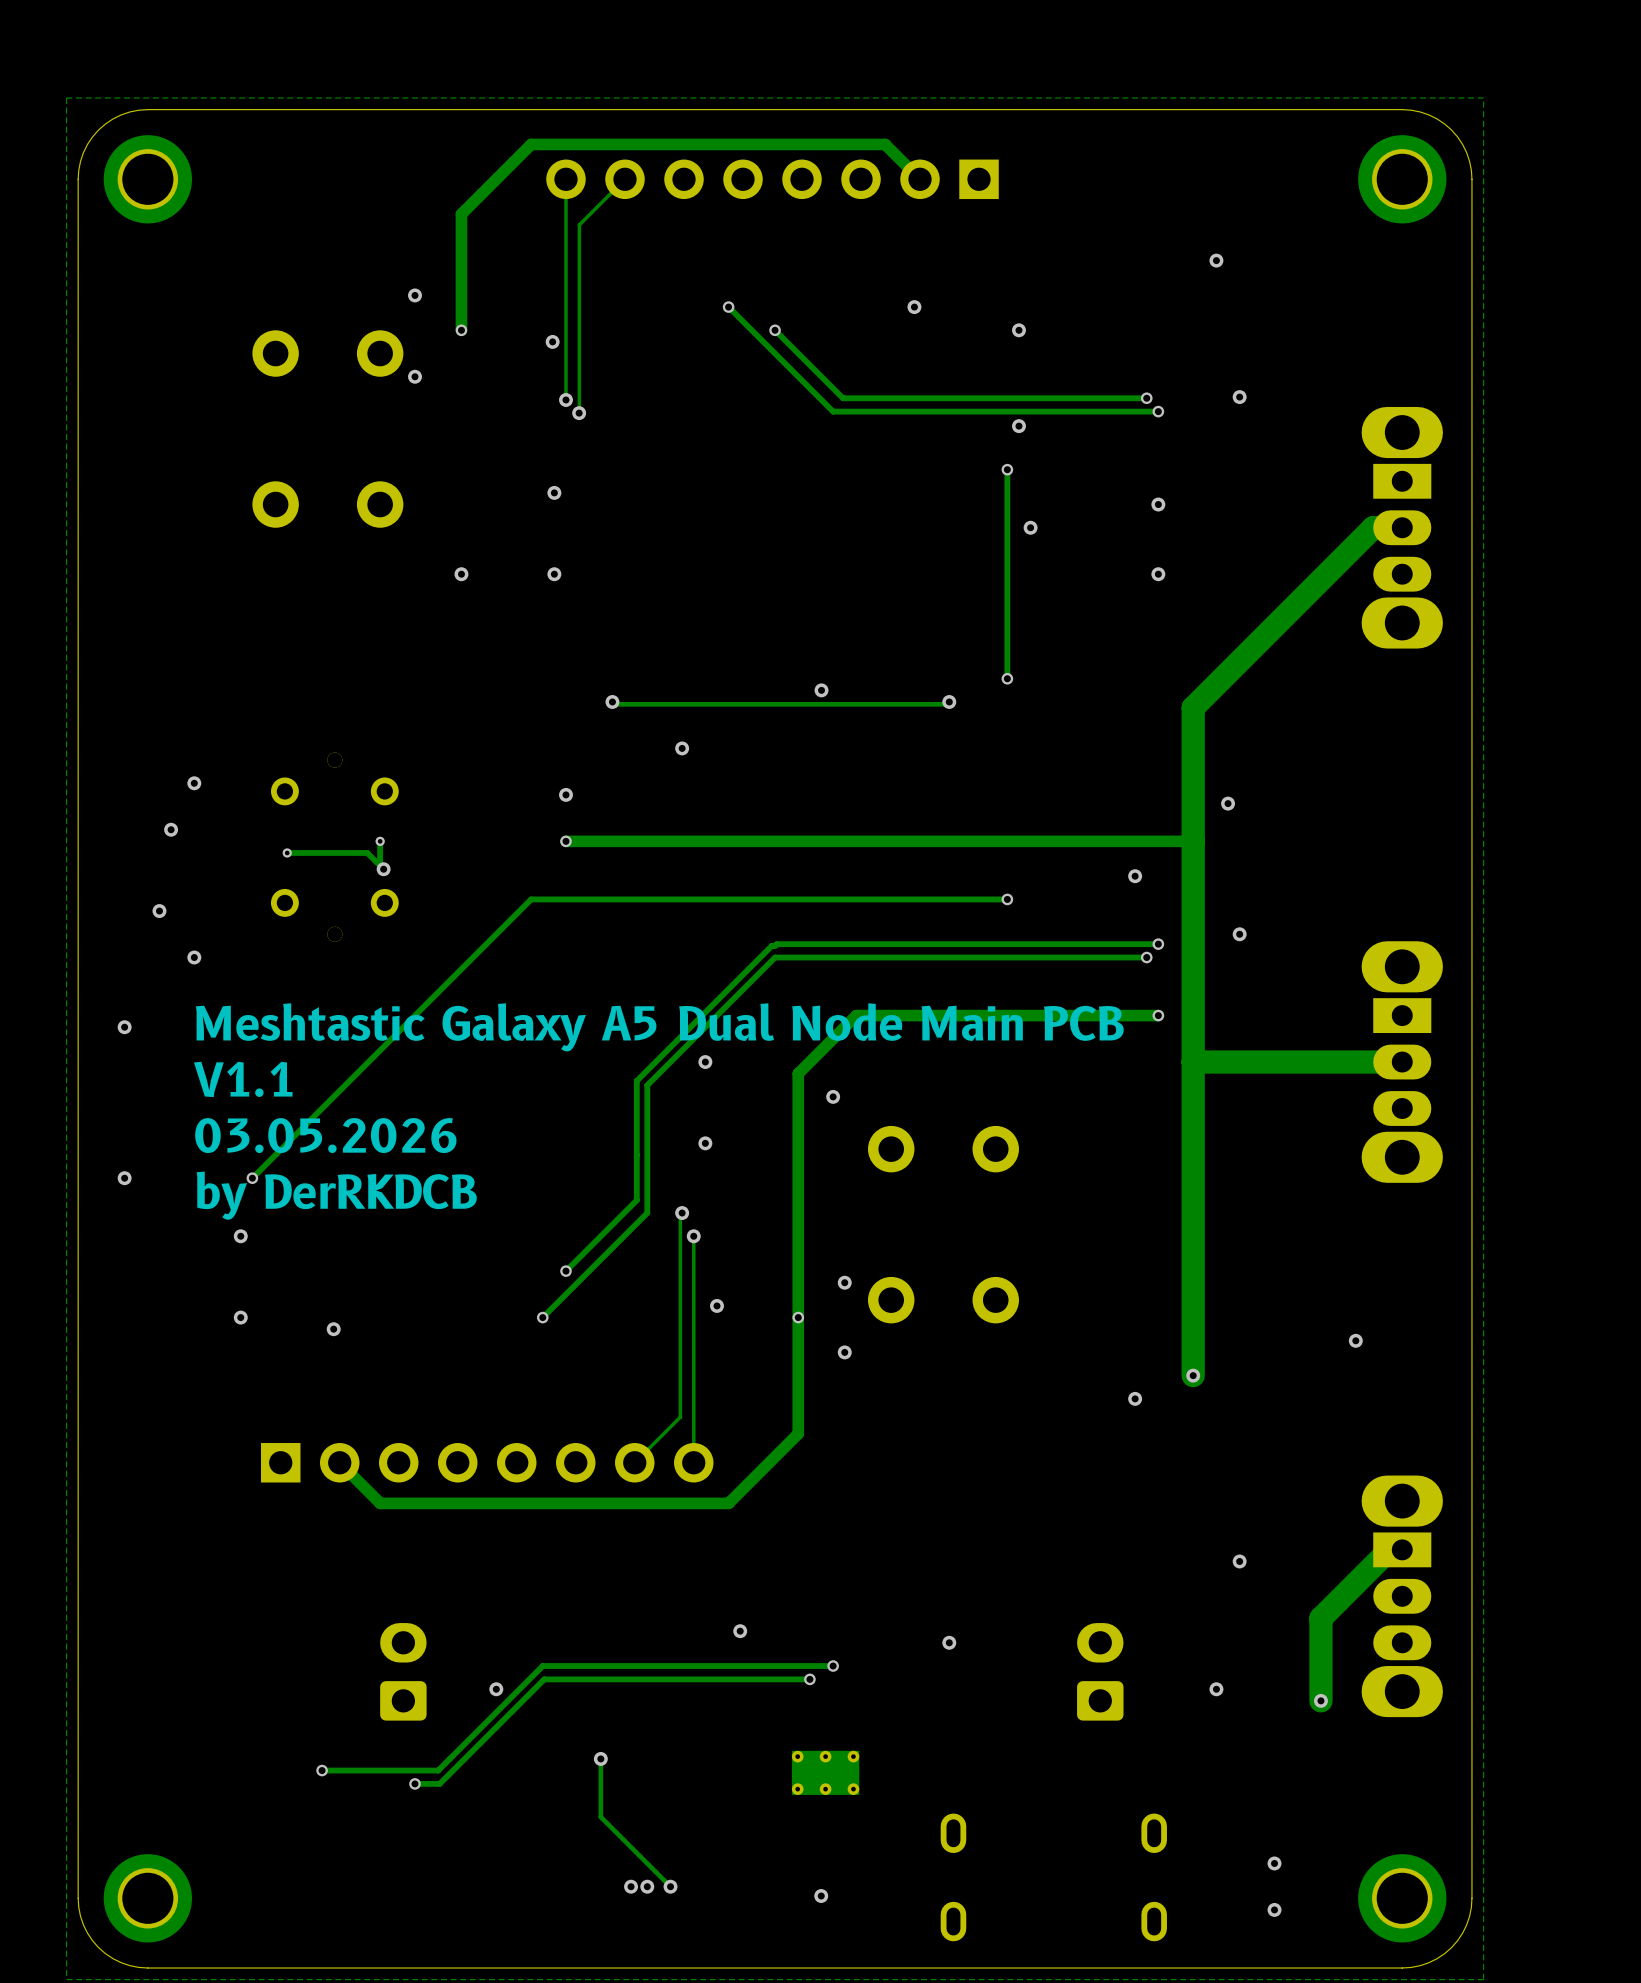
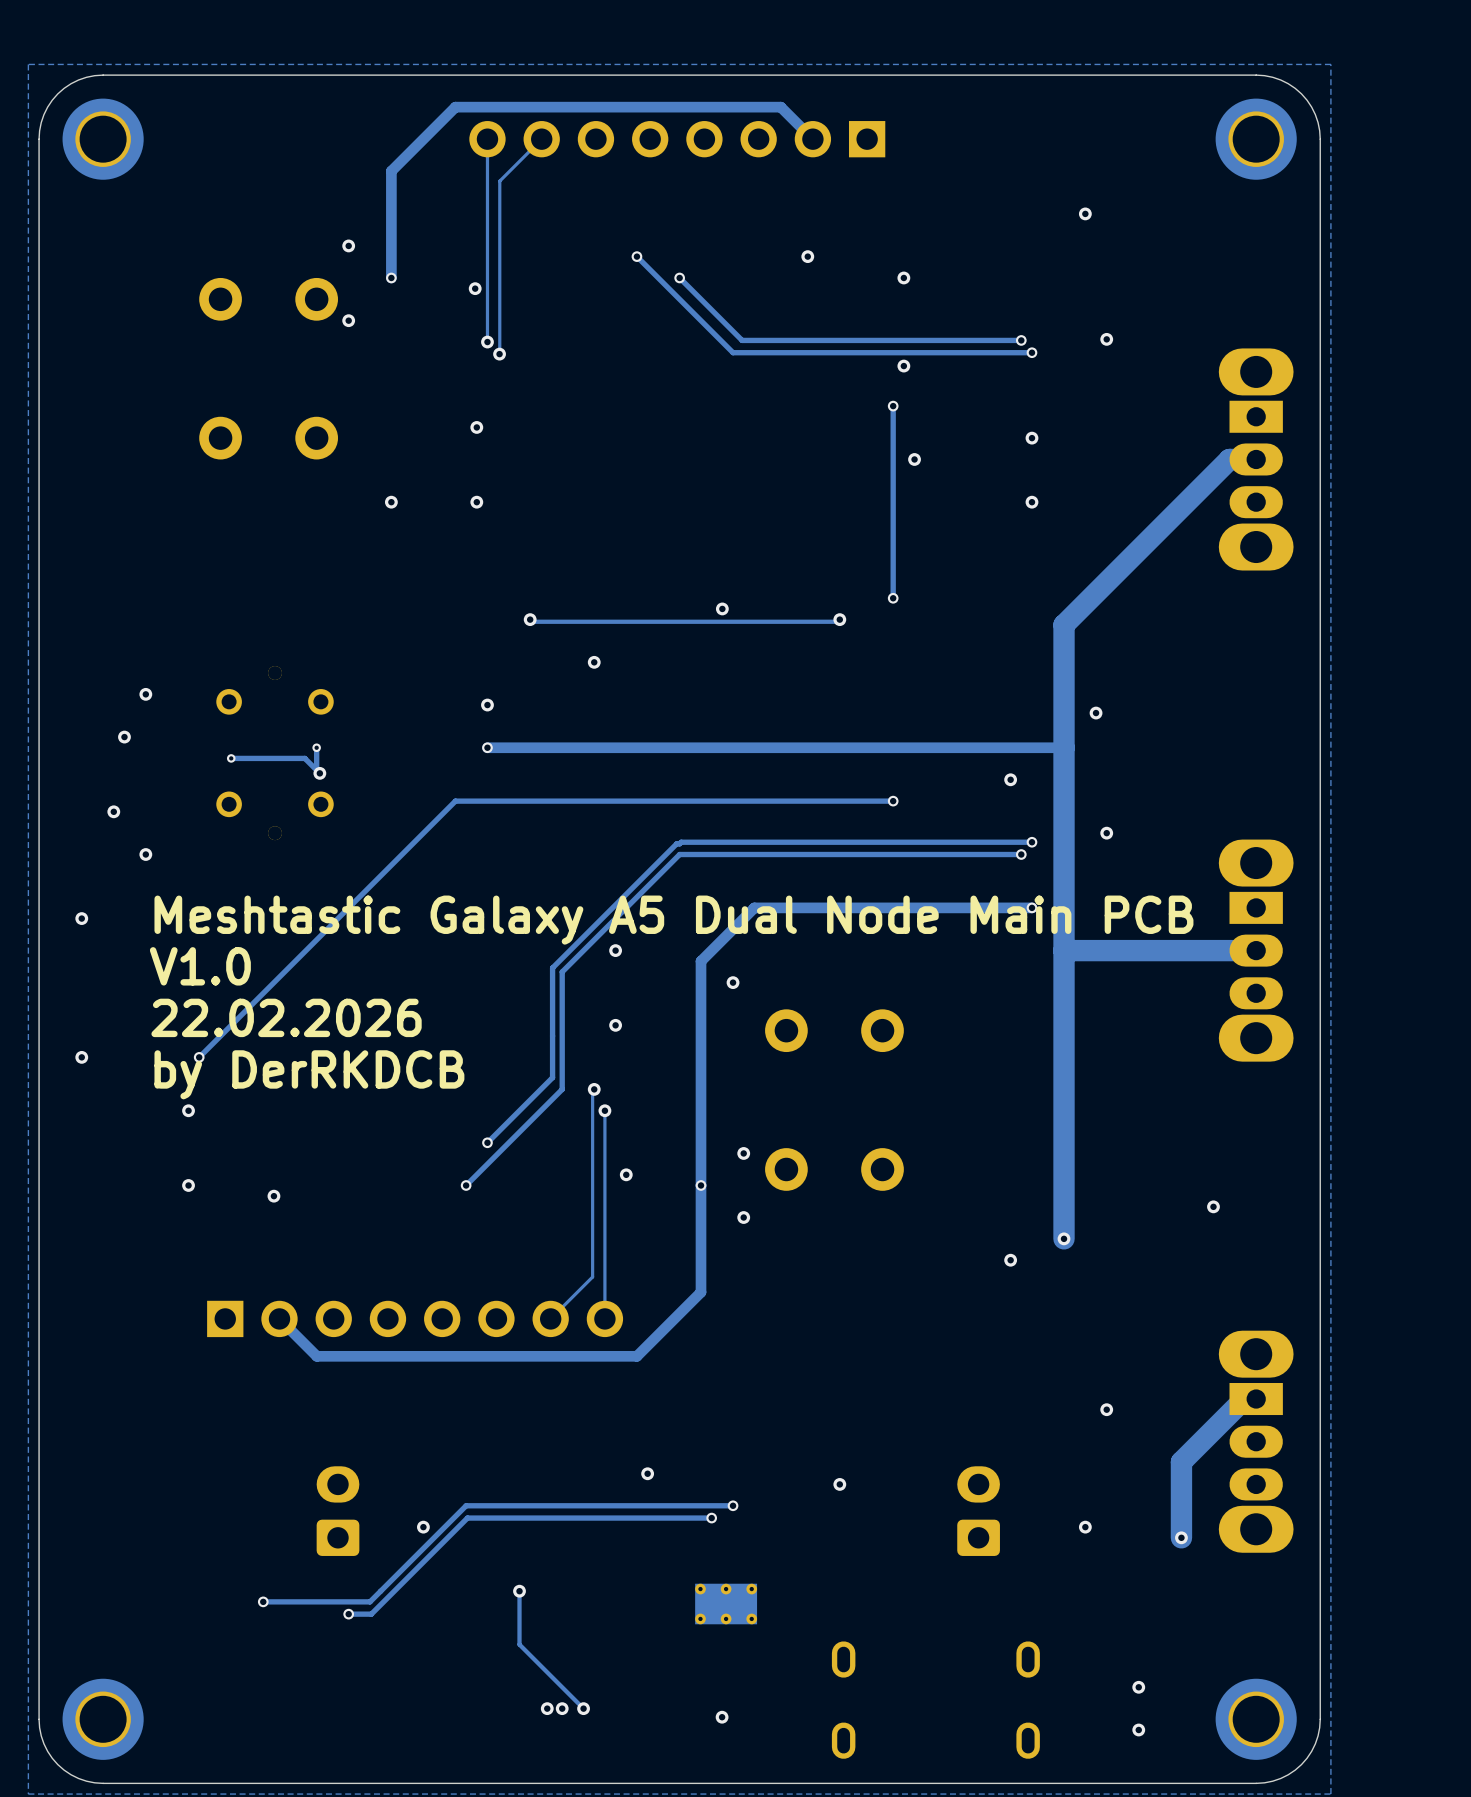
text: V1.1 (243, 1079) -> V1.0 (200, 966)
text: 03.05.2026 (325, 1135) -> 22.02.2026 (286, 1017)

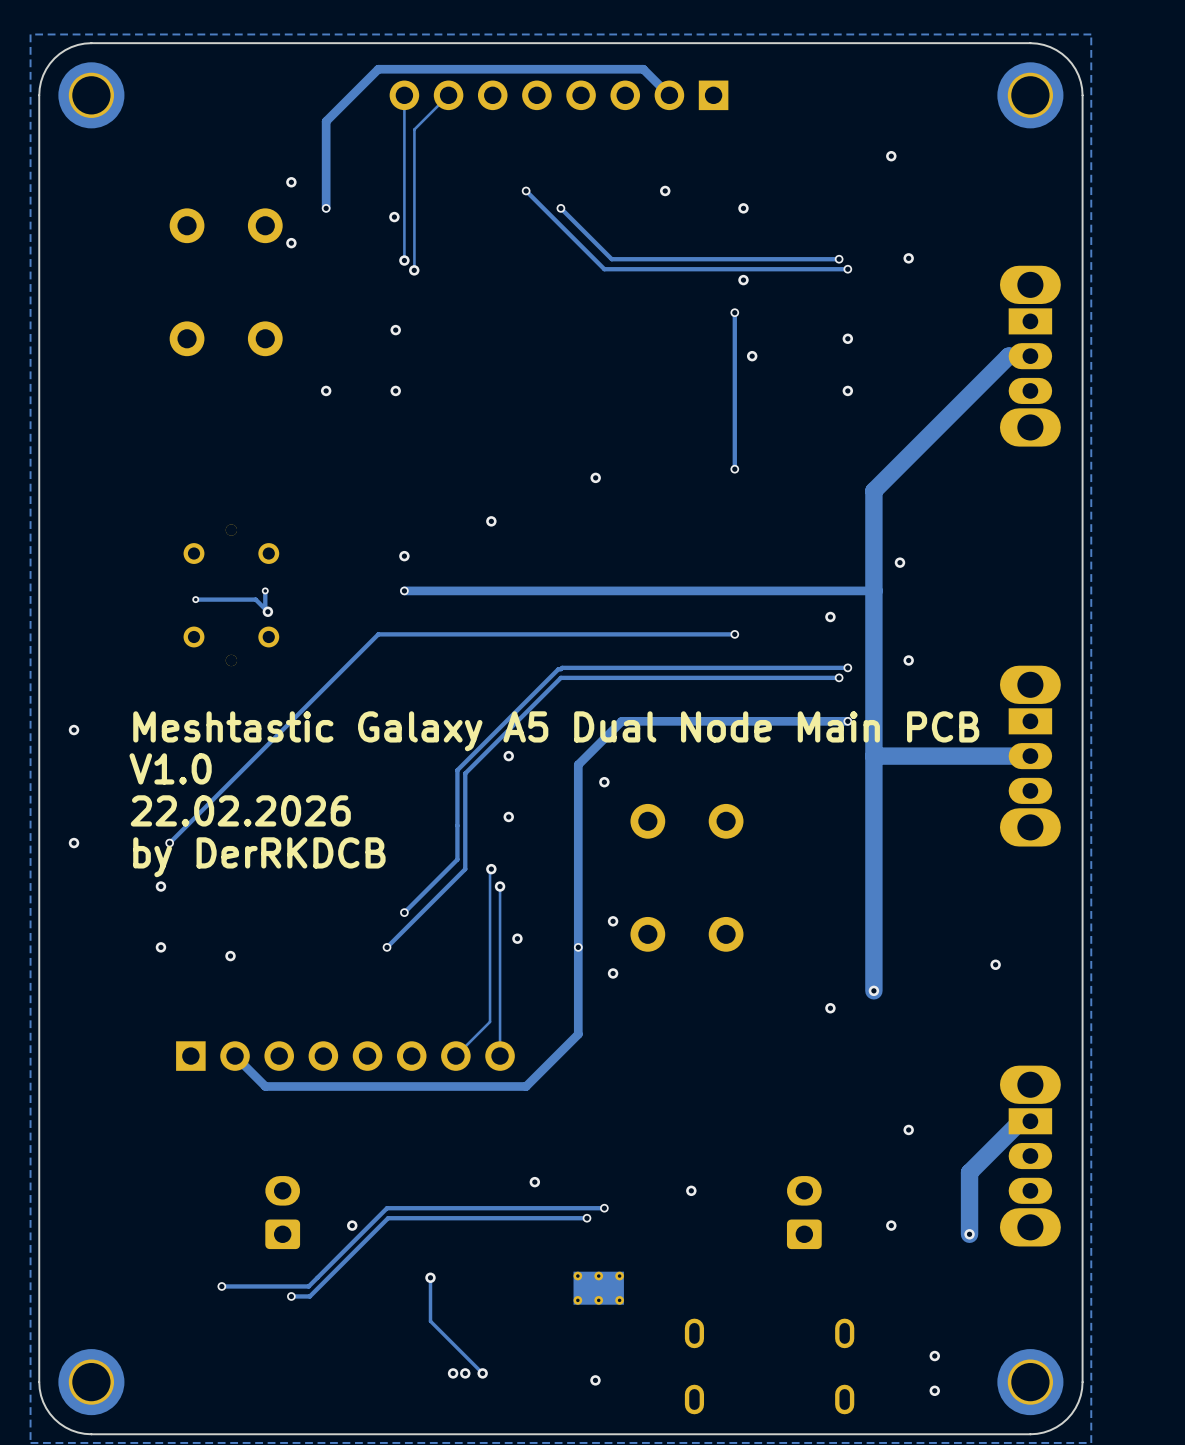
via: (530, 619) -> none
track: (839, 619) (837, 621) (532, 621) (530, 619) -> none
via: (839, 619) -> none
via: (145, 694) -> none
via: (124, 737) -> none
via: (113, 811) -> none
via: (145, 854) -> none

